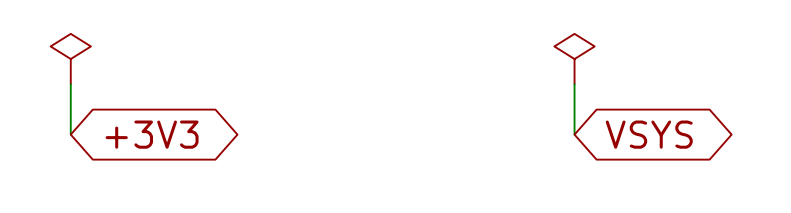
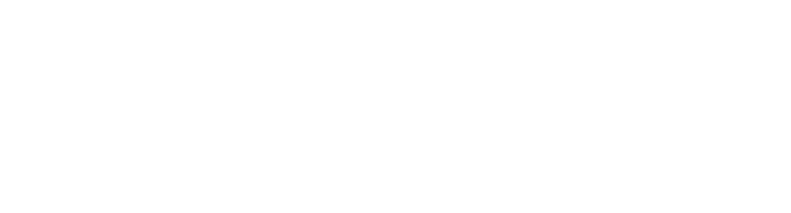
power symbol: (70, 59) -> none
power symbol: (574, 59) -> none
wire: (70, 84) (70, 134) -> none
wire: (574, 84) (574, 134) -> none
global label: +3V3 (152, 134) -> none
global label: VSYS (649, 134) -> none

